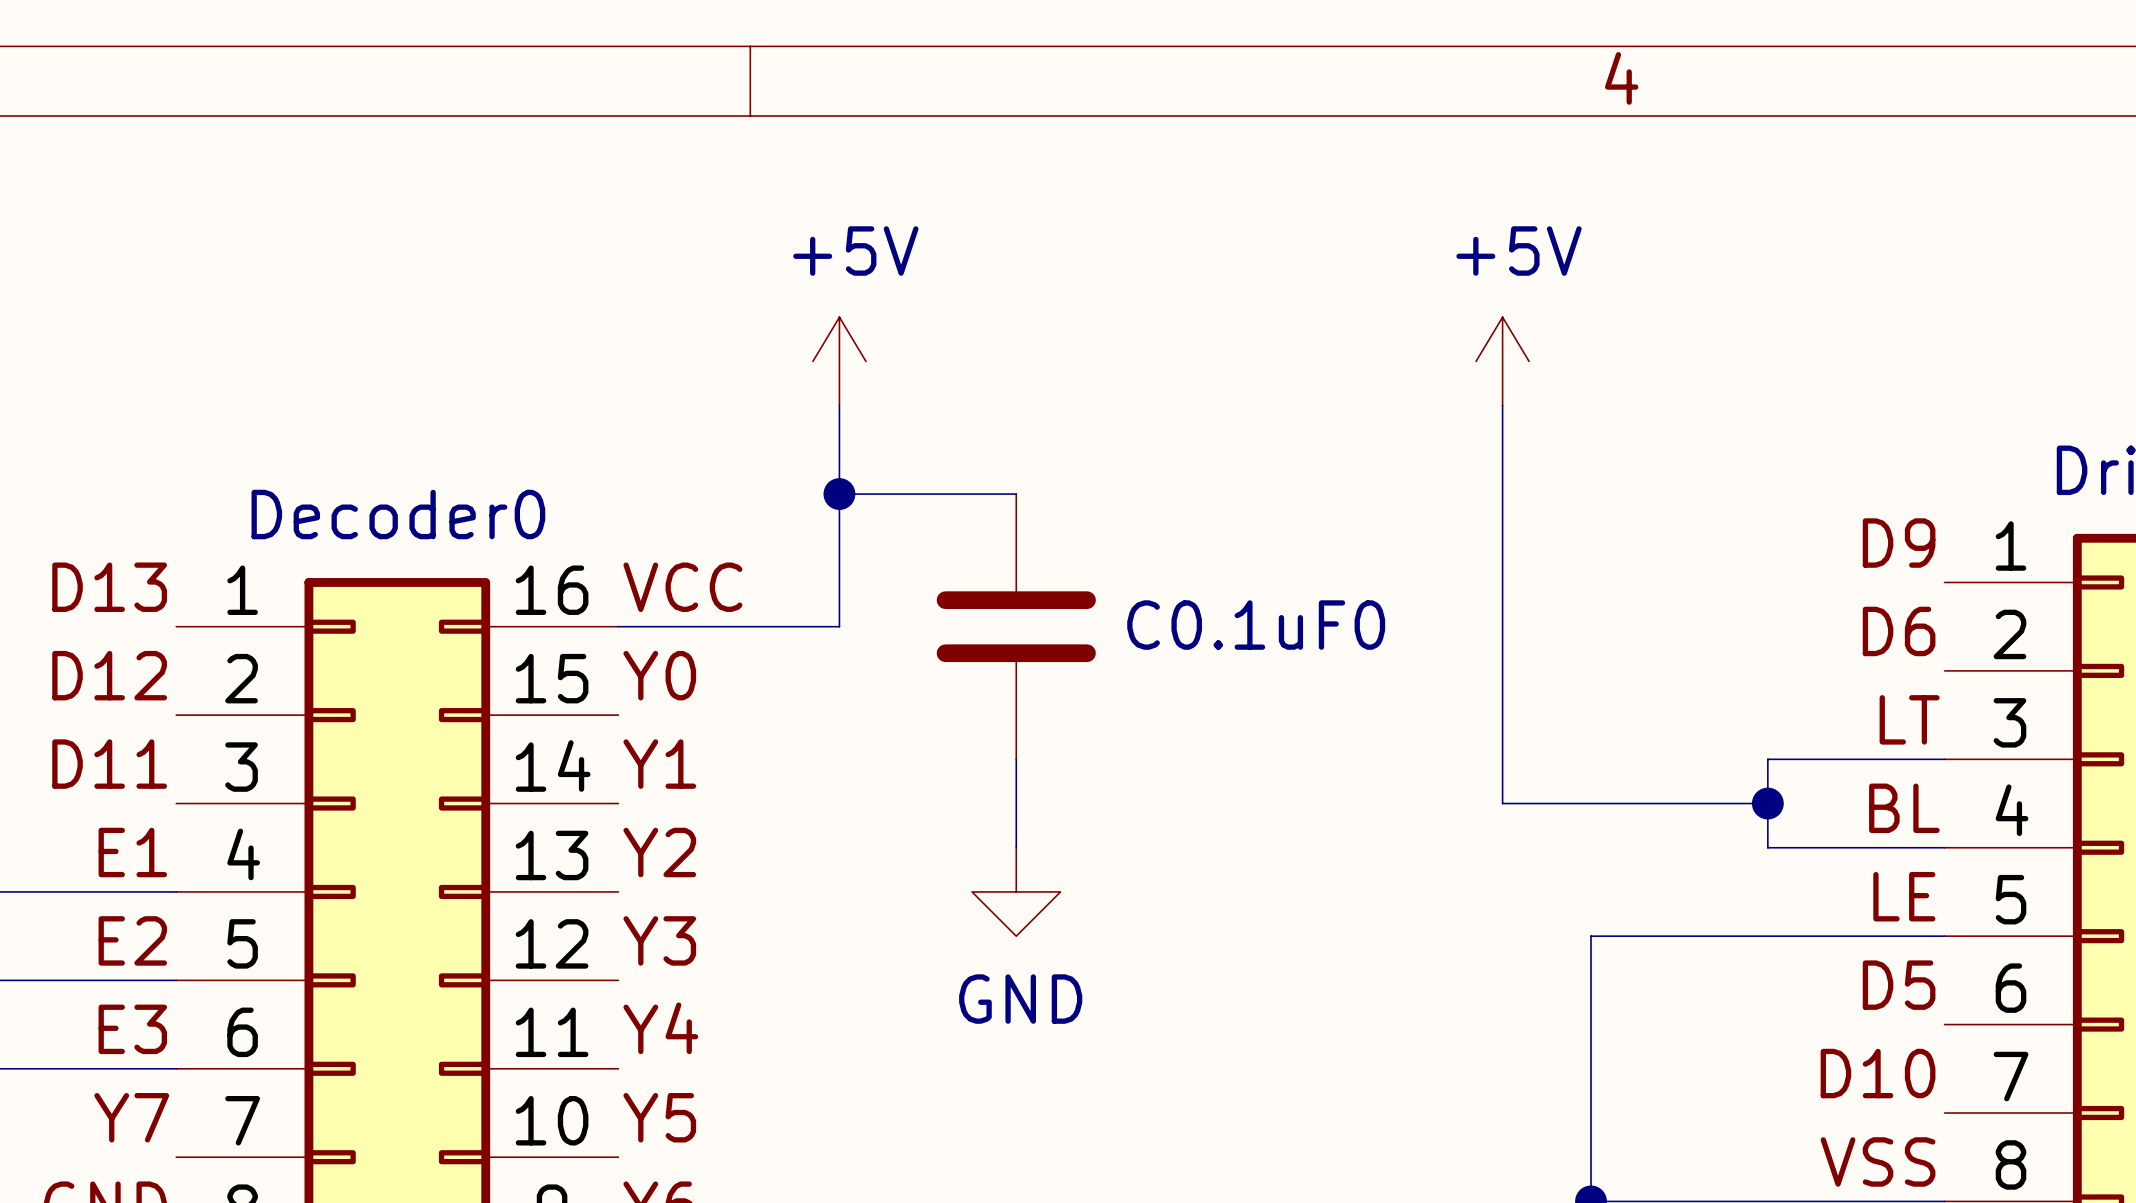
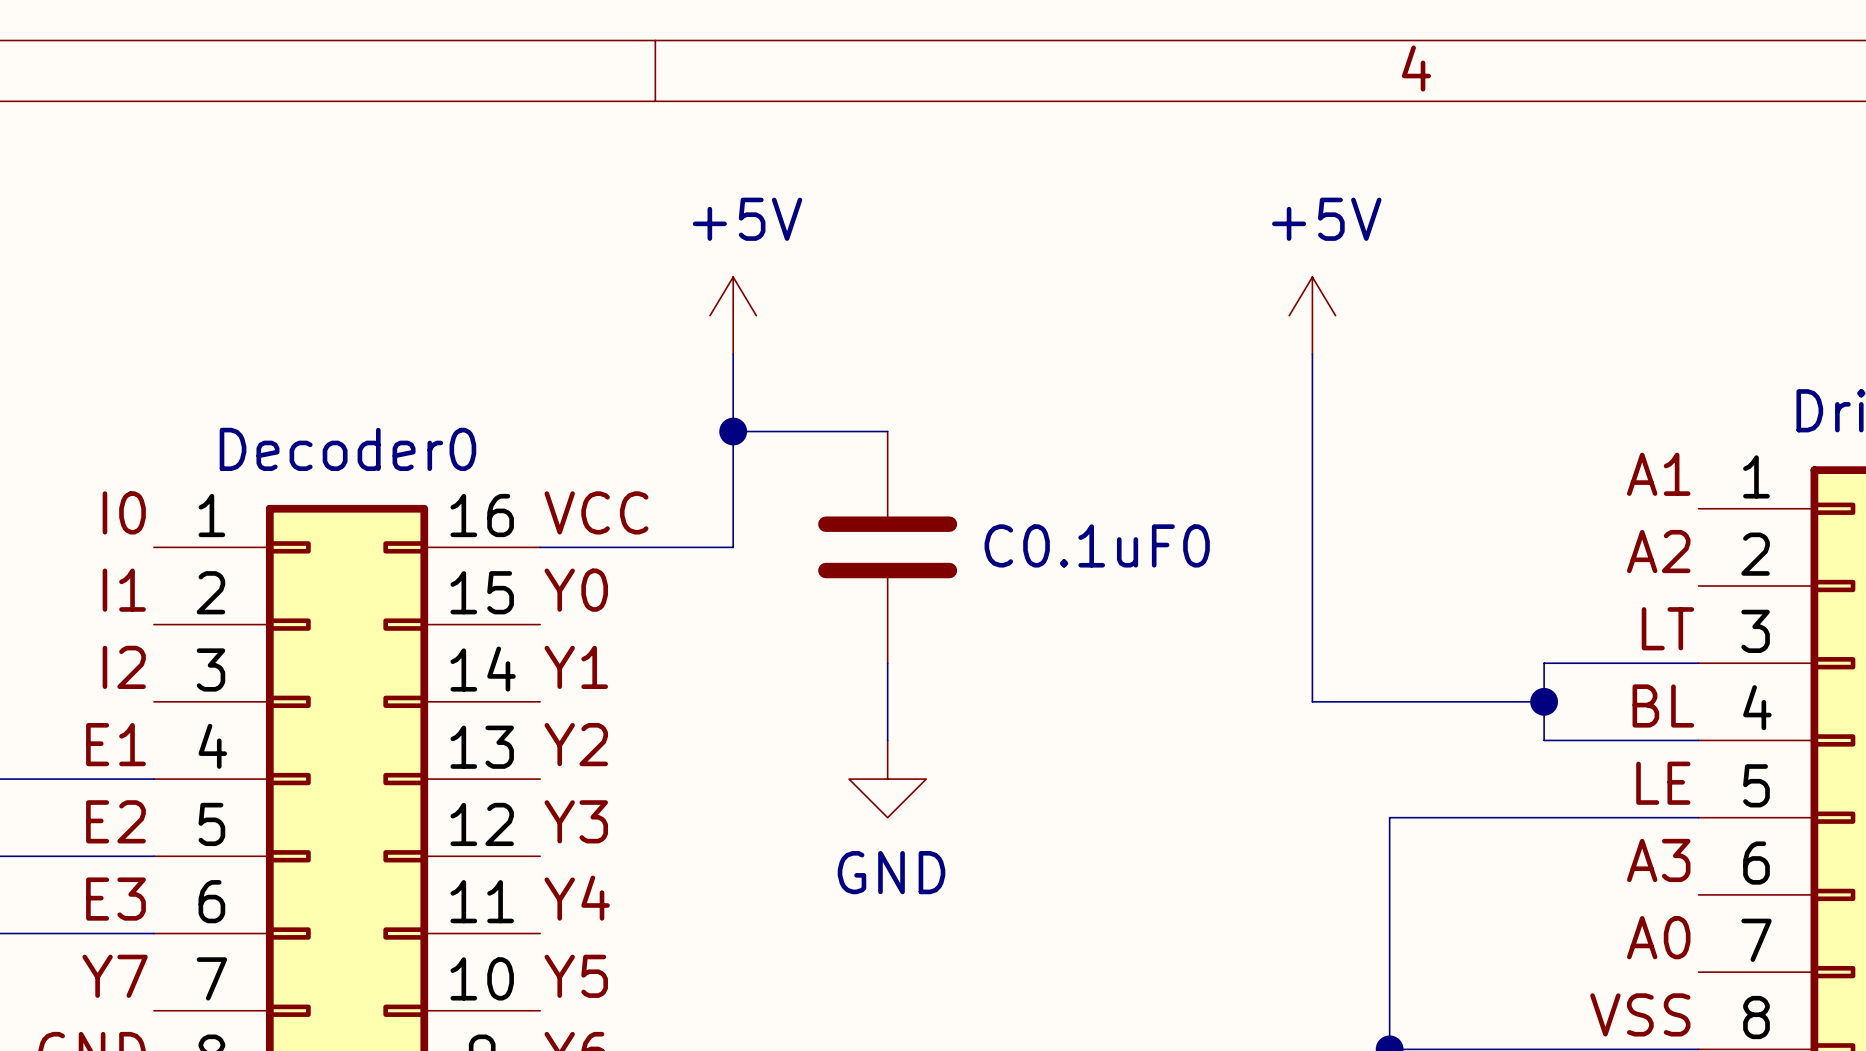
label: D9 (1899, 543) -> A1 (1658, 474)
label: D13 (109, 587) -> I0 (124, 512)
label: D6 (1899, 631) -> A2 (1658, 551)
label: D12 (109, 675) -> I1 (124, 590)
label: D11 (109, 764) -> I2 (124, 667)
label: D5 (1899, 985) -> A3 (1658, 860)
label: D10 (1878, 1073) -> A0 (1658, 937)

